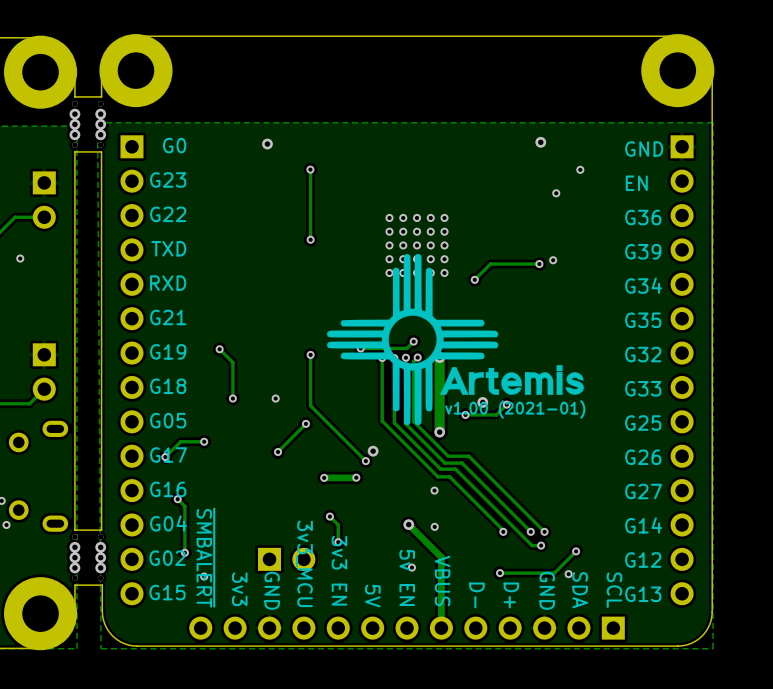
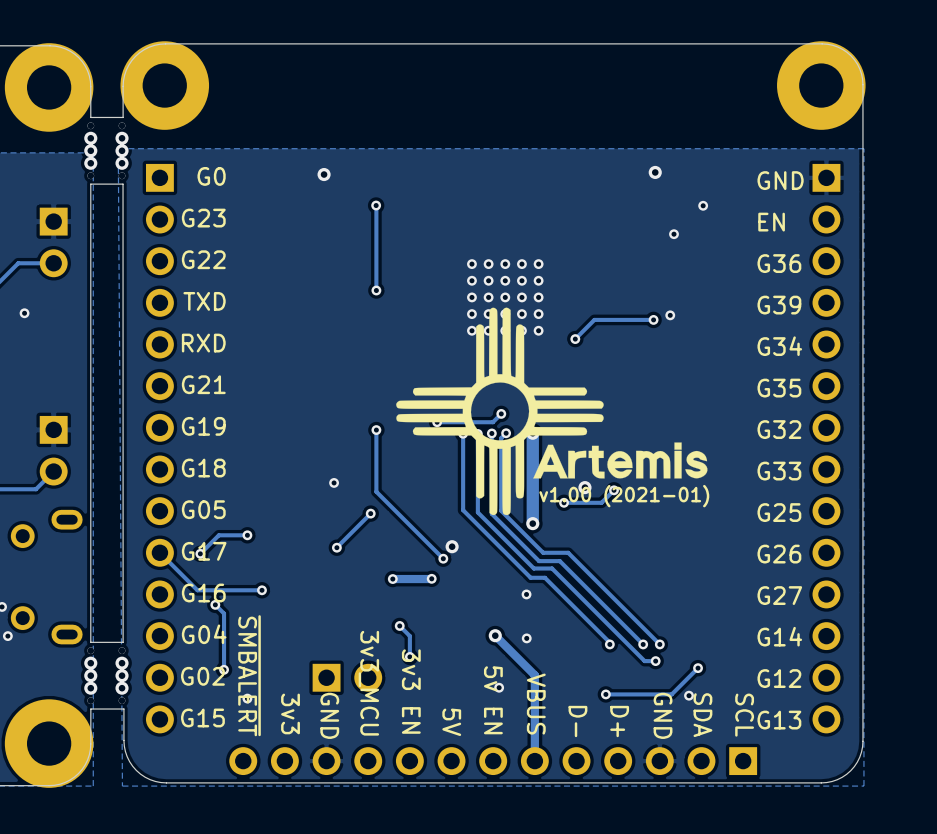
track: (219, 349) (232, 362) (232, 398) -> none
via: (219, 349) -> none
via: (232, 398) -> none
track: none -> (159, 552) (197, 590) (262, 590)
via: none -> (262, 590)

